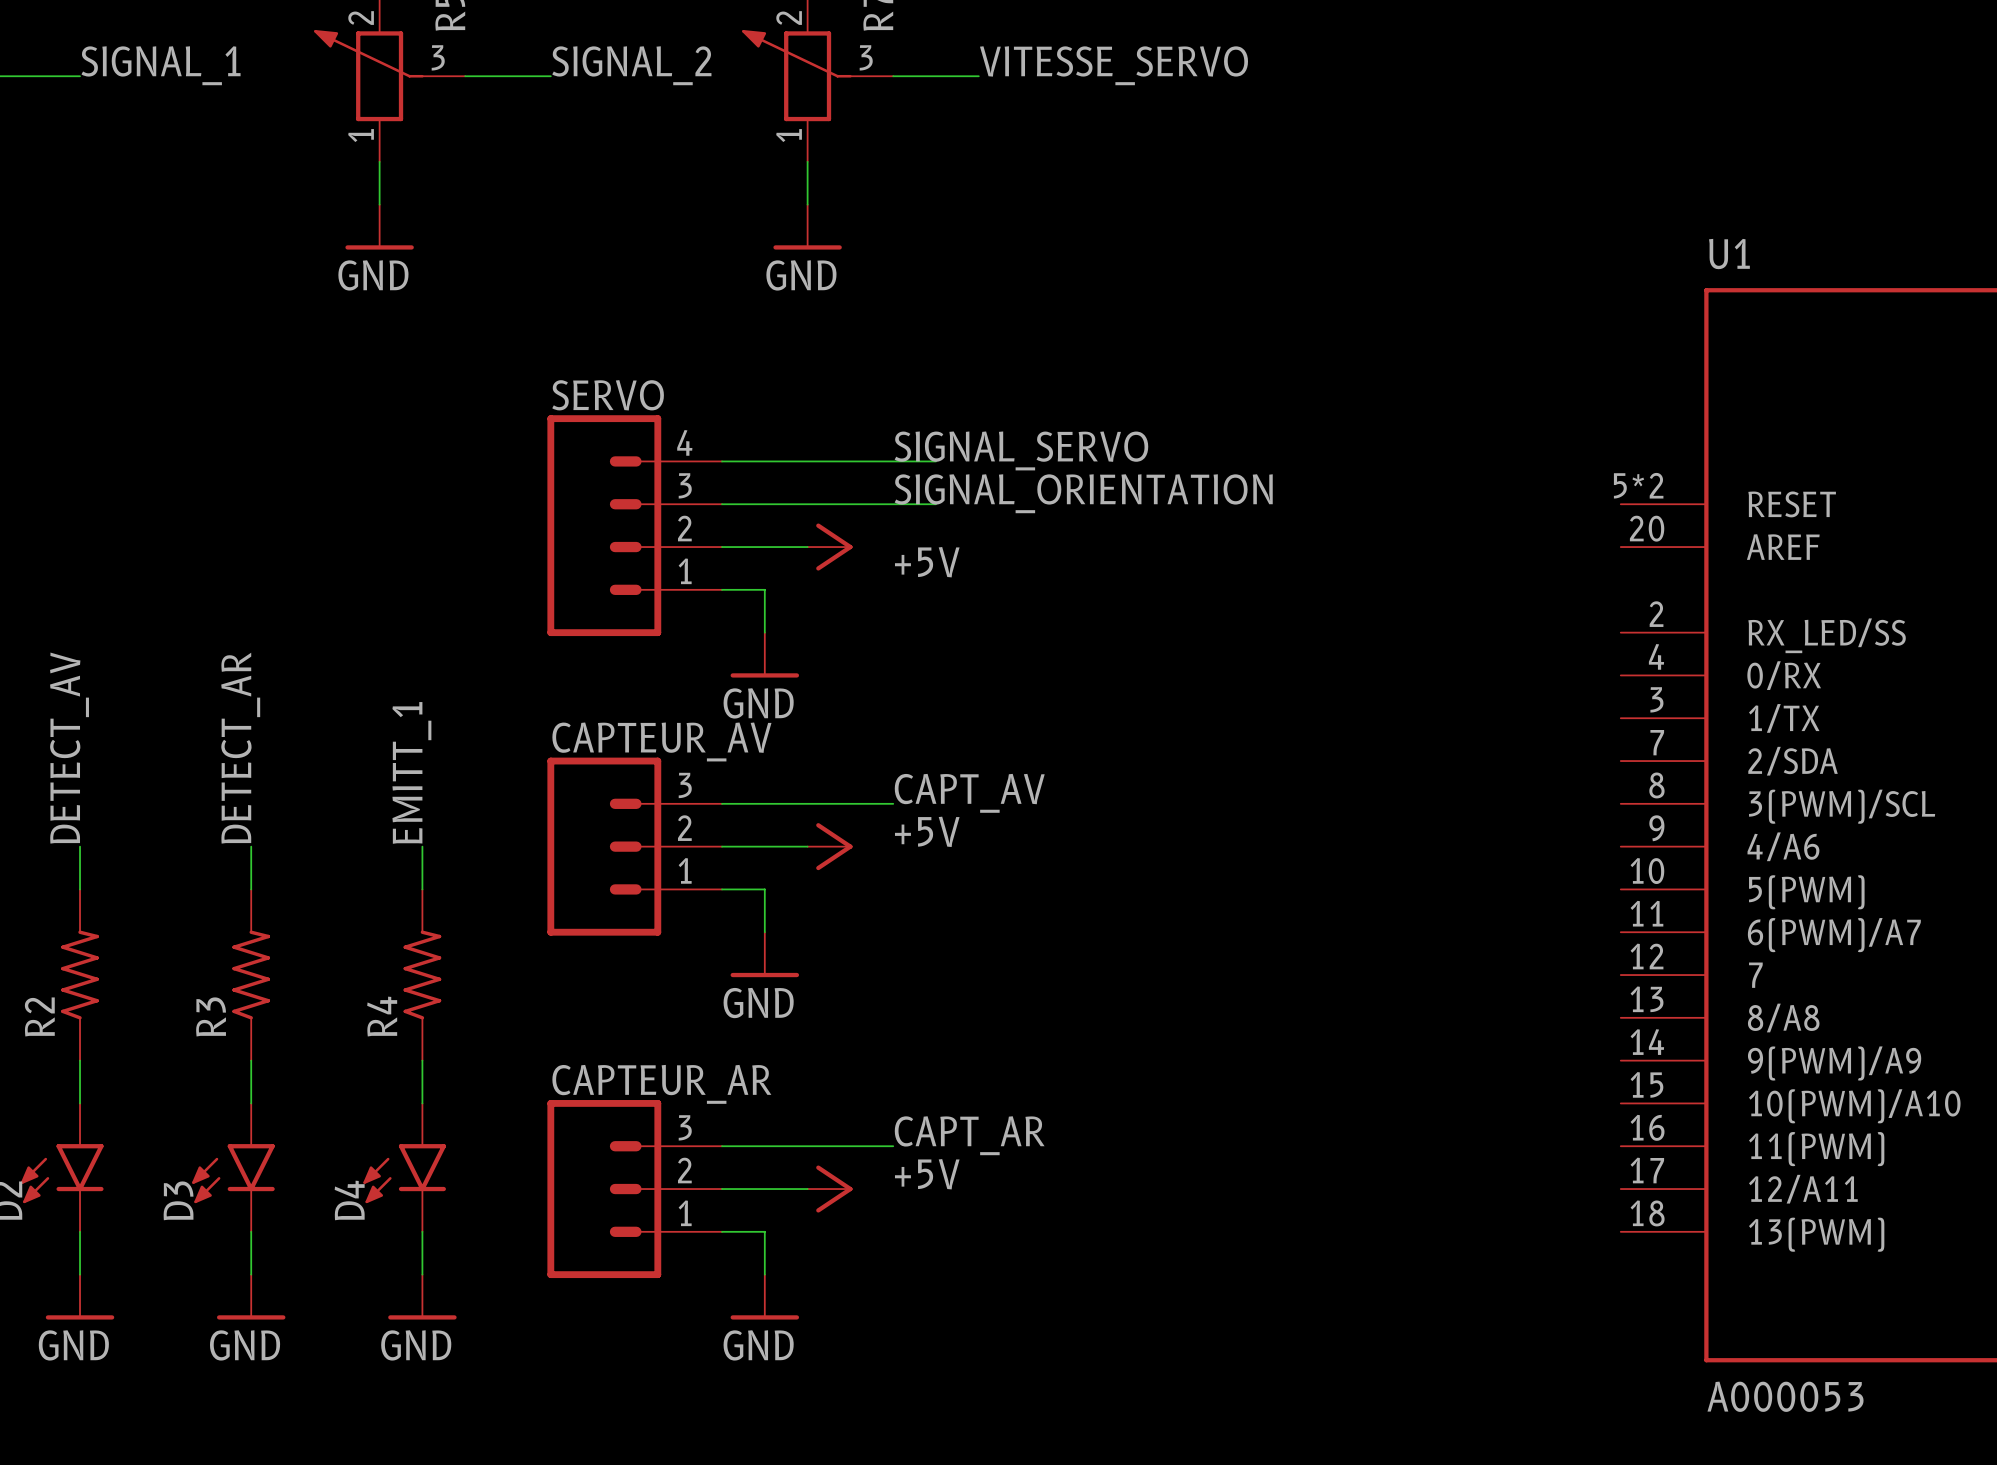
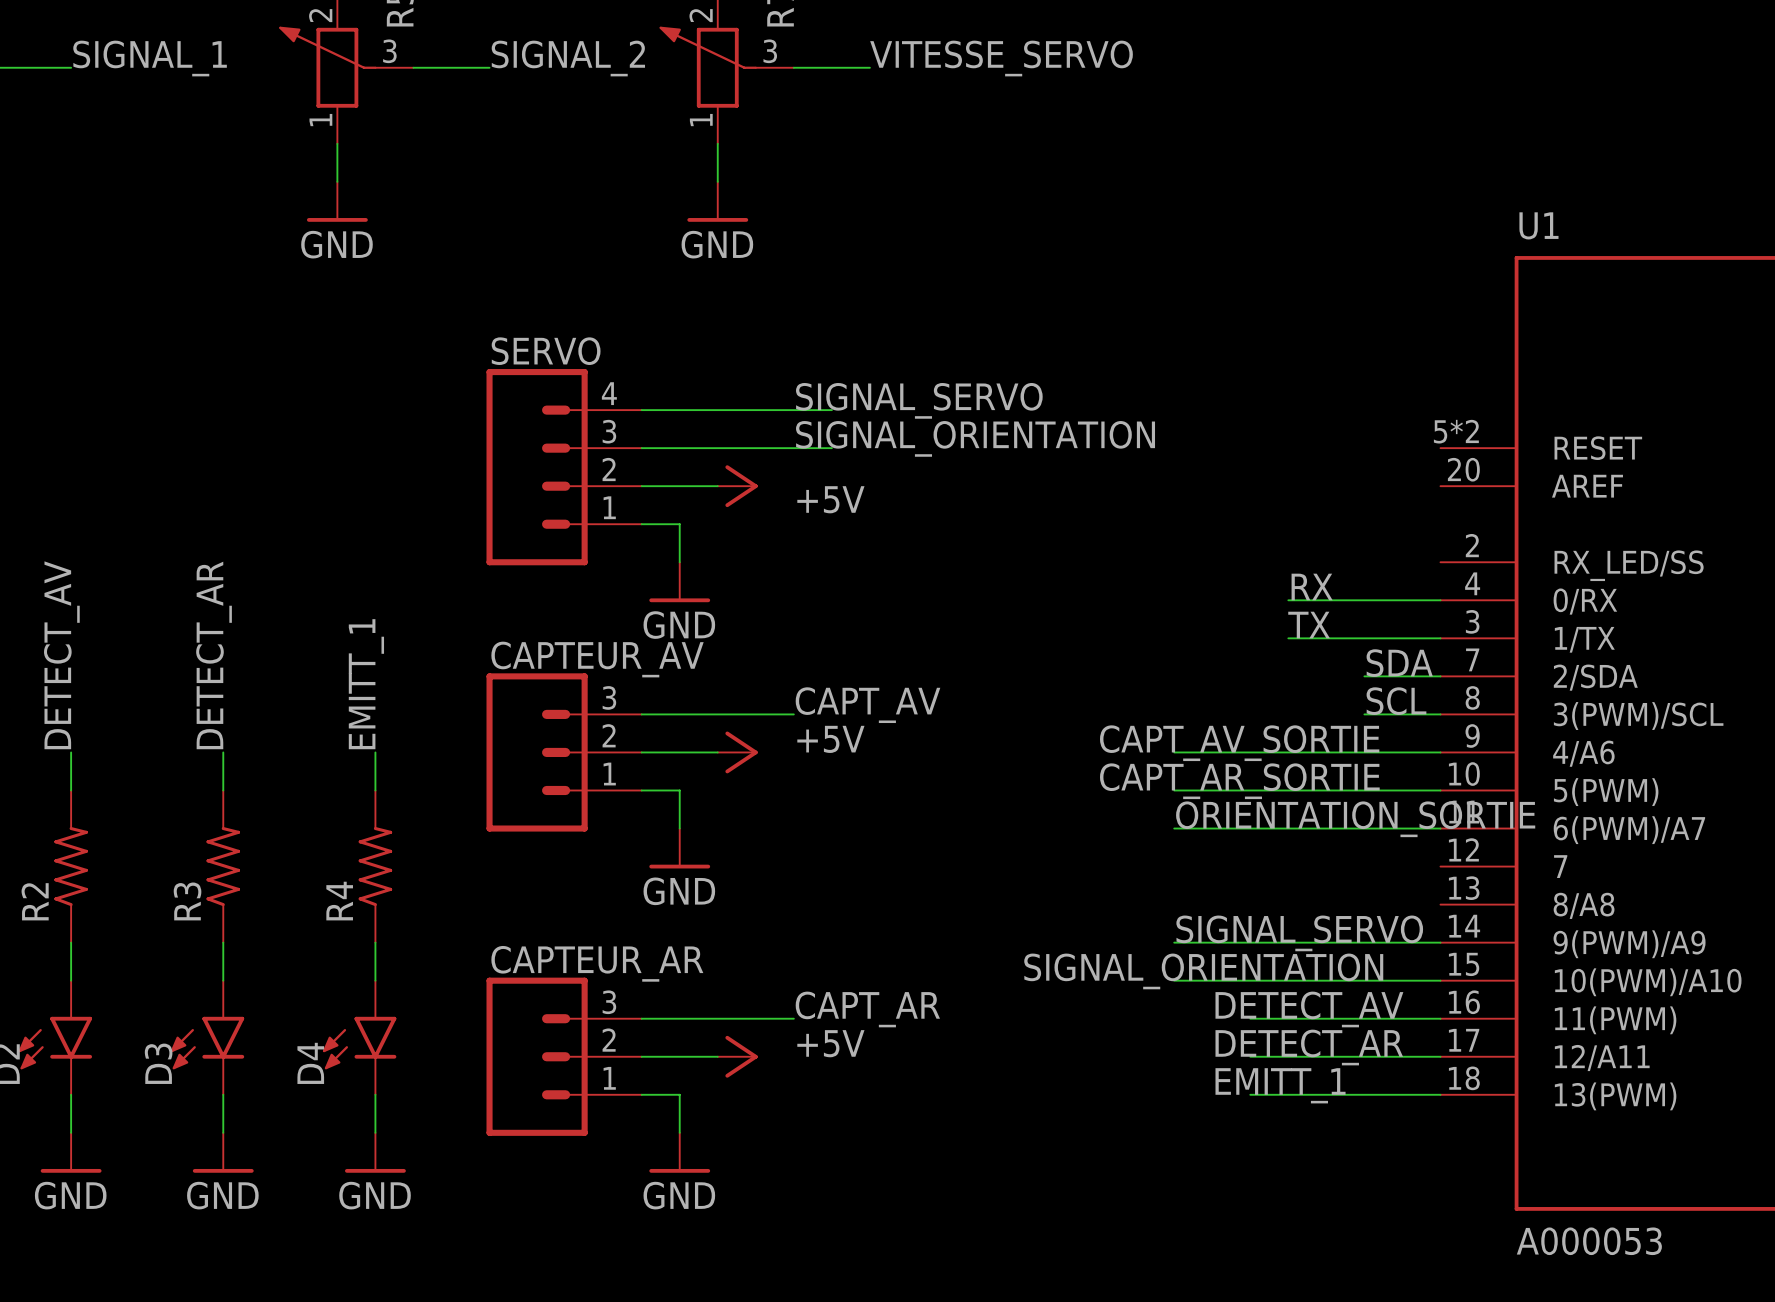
label: none -> RX (1312, 586)
wire: none -> (1288, 600) (1440, 600)
label: none -> TX (1309, 625)
wire: none -> (1288, 638) (1440, 638)
label: none -> SDA (1399, 663)
wire: none -> (1364, 676) (1440, 676)
label: none -> SCL (1396, 701)
wire: none -> (1364, 714) (1440, 714)
label: none -> CAPT_AV_SORTIE (1239, 743)
wire: none -> (1174, 752) (1440, 752)
label: none -> CAPT_AR_SORTIE (1239, 781)
wire: none -> (1174, 790) (1440, 790)
label: none -> ORIENTATION_SORTIE (1355, 819)
wire: none -> (1174, 828) (1440, 828)
label: none -> SIGNAL_SERVO (1299, 933)
wire: none -> (1174, 942) (1440, 942)
label: none -> SIGNAL_ORIENTATION (1203, 971)
wire: none -> (1174, 980) (1440, 980)
label: none -> DETECT_AV (1309, 1009)
wire: none -> (1250, 1018) (1440, 1018)
label: none -> DETECT_AR (1309, 1047)
wire: none -> (1250, 1056) (1440, 1056)
label: none -> EMITT_1 (1280, 1085)
wire: none -> (1250, 1094) (1440, 1094)

